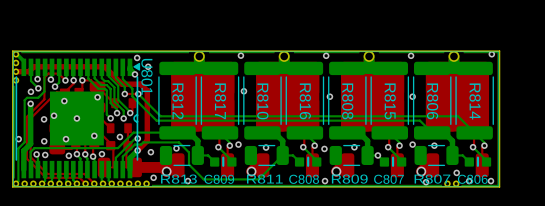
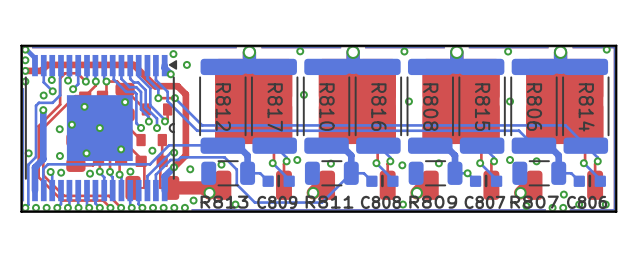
U801 name: U801 (146, 76) -> none

